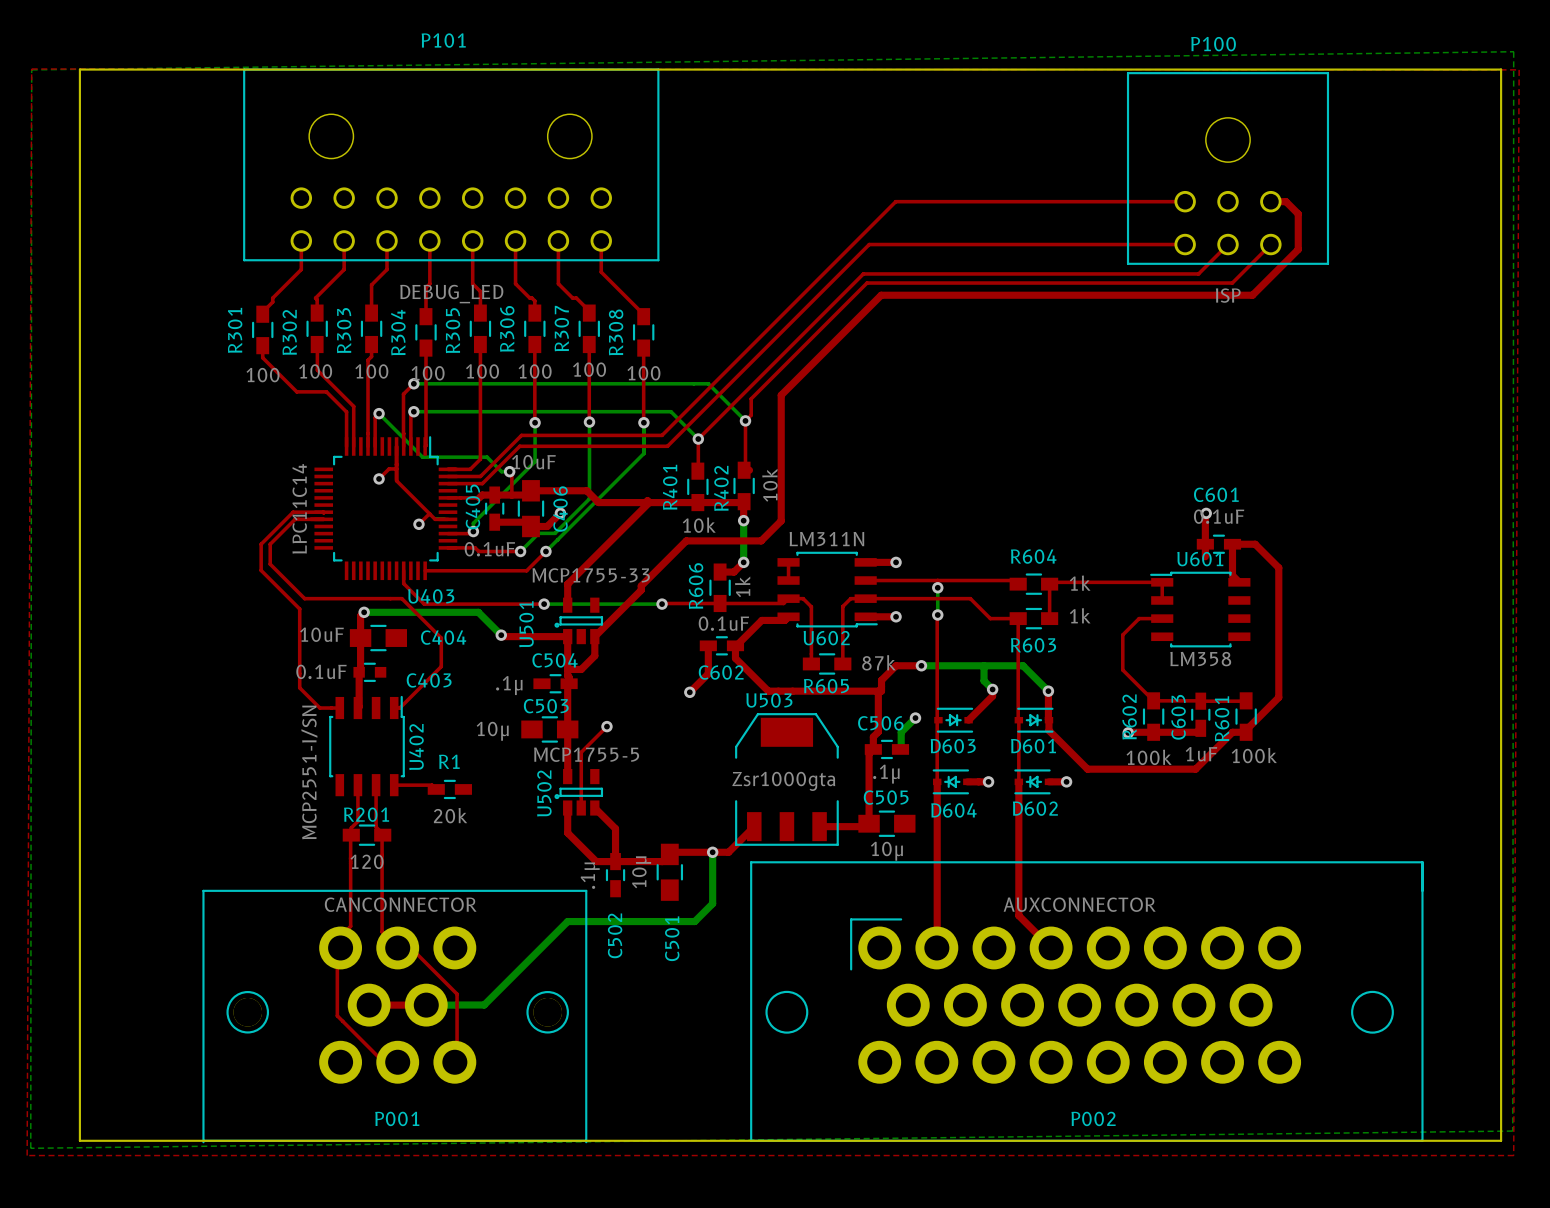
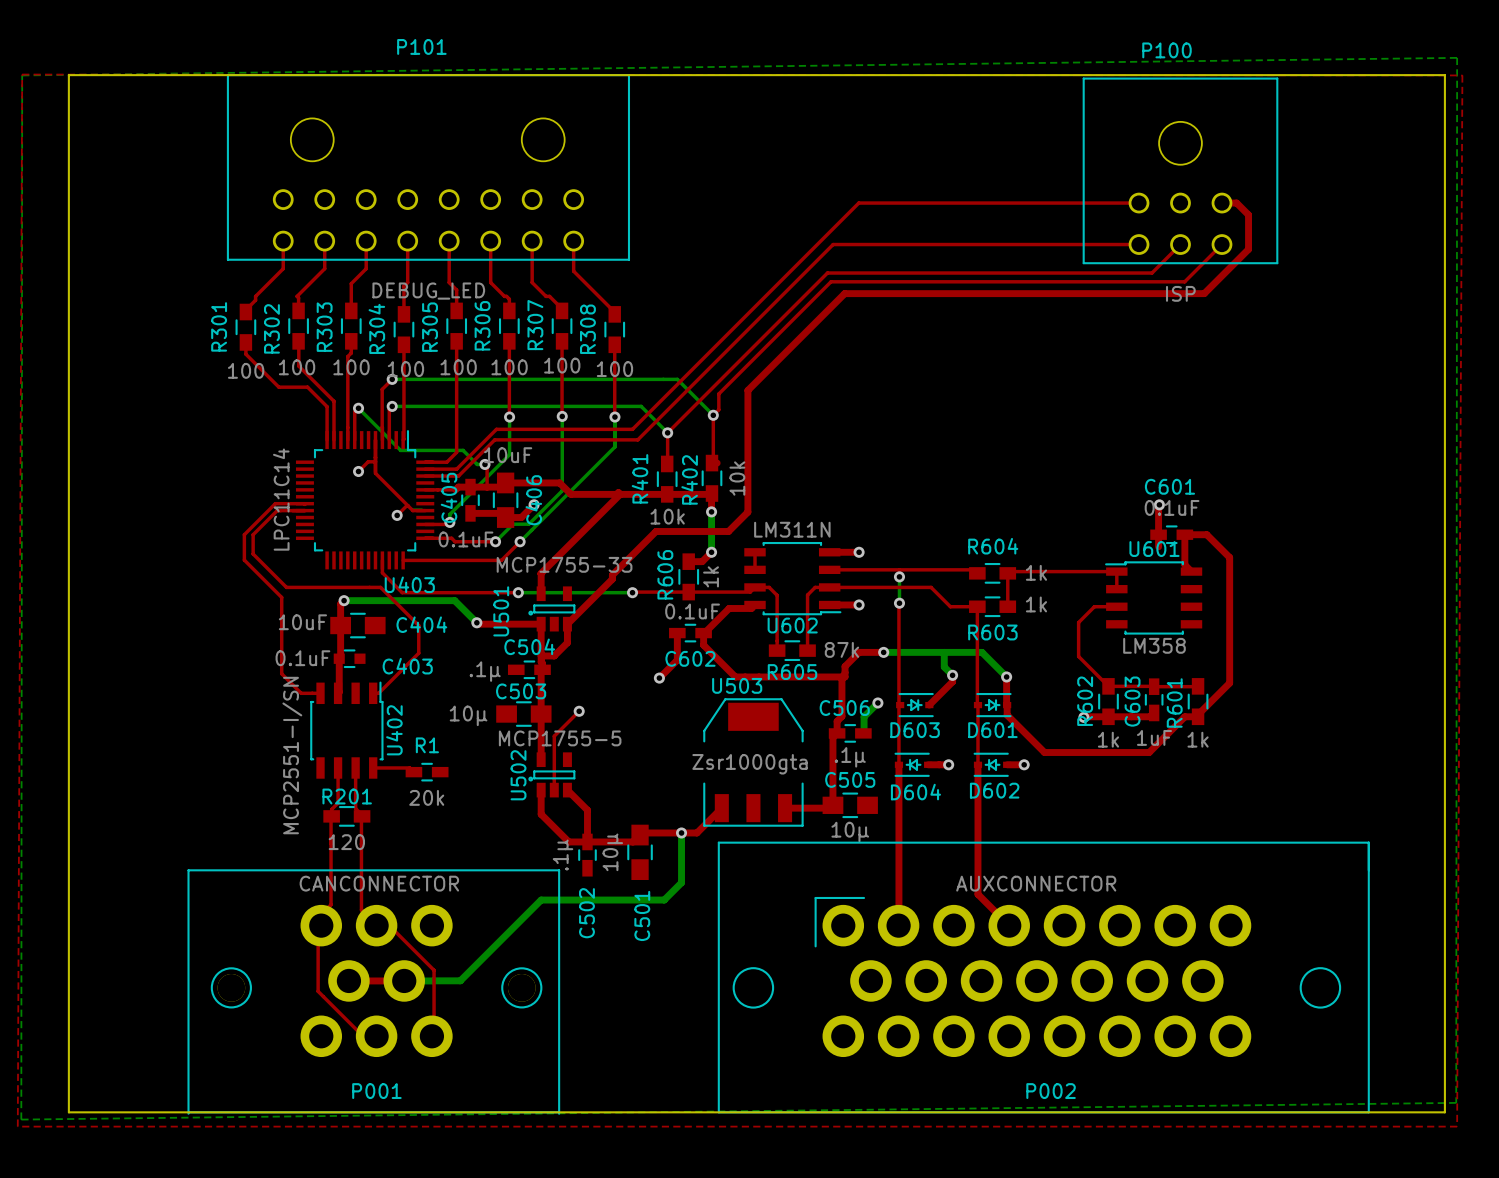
R601 value: 100k (1254, 755) -> 1k (1198, 739)
R602 value: 100k (1149, 757) -> 1k (1108, 739)

